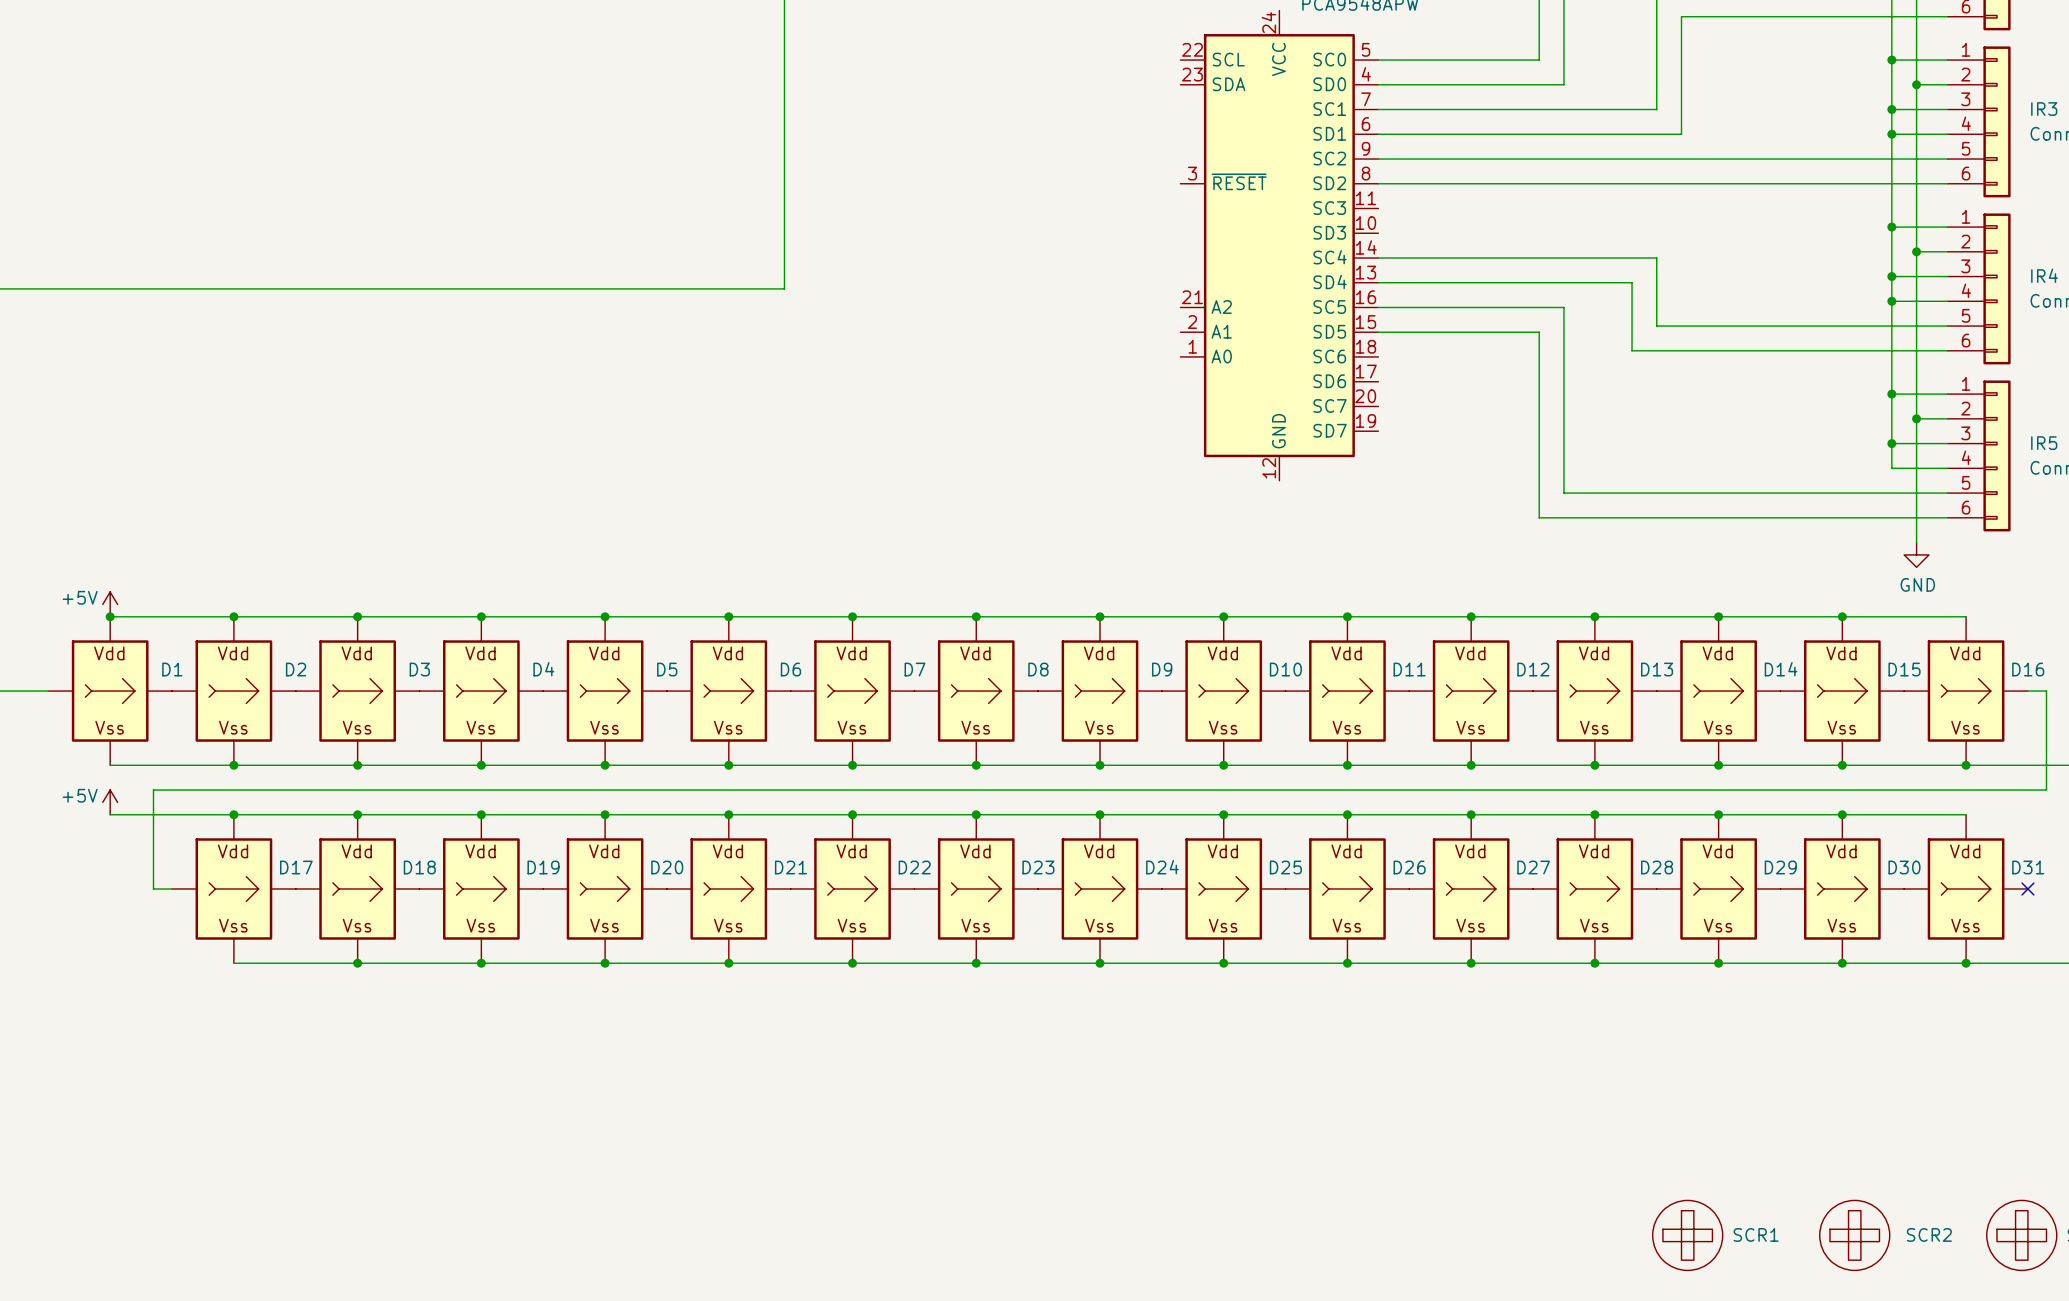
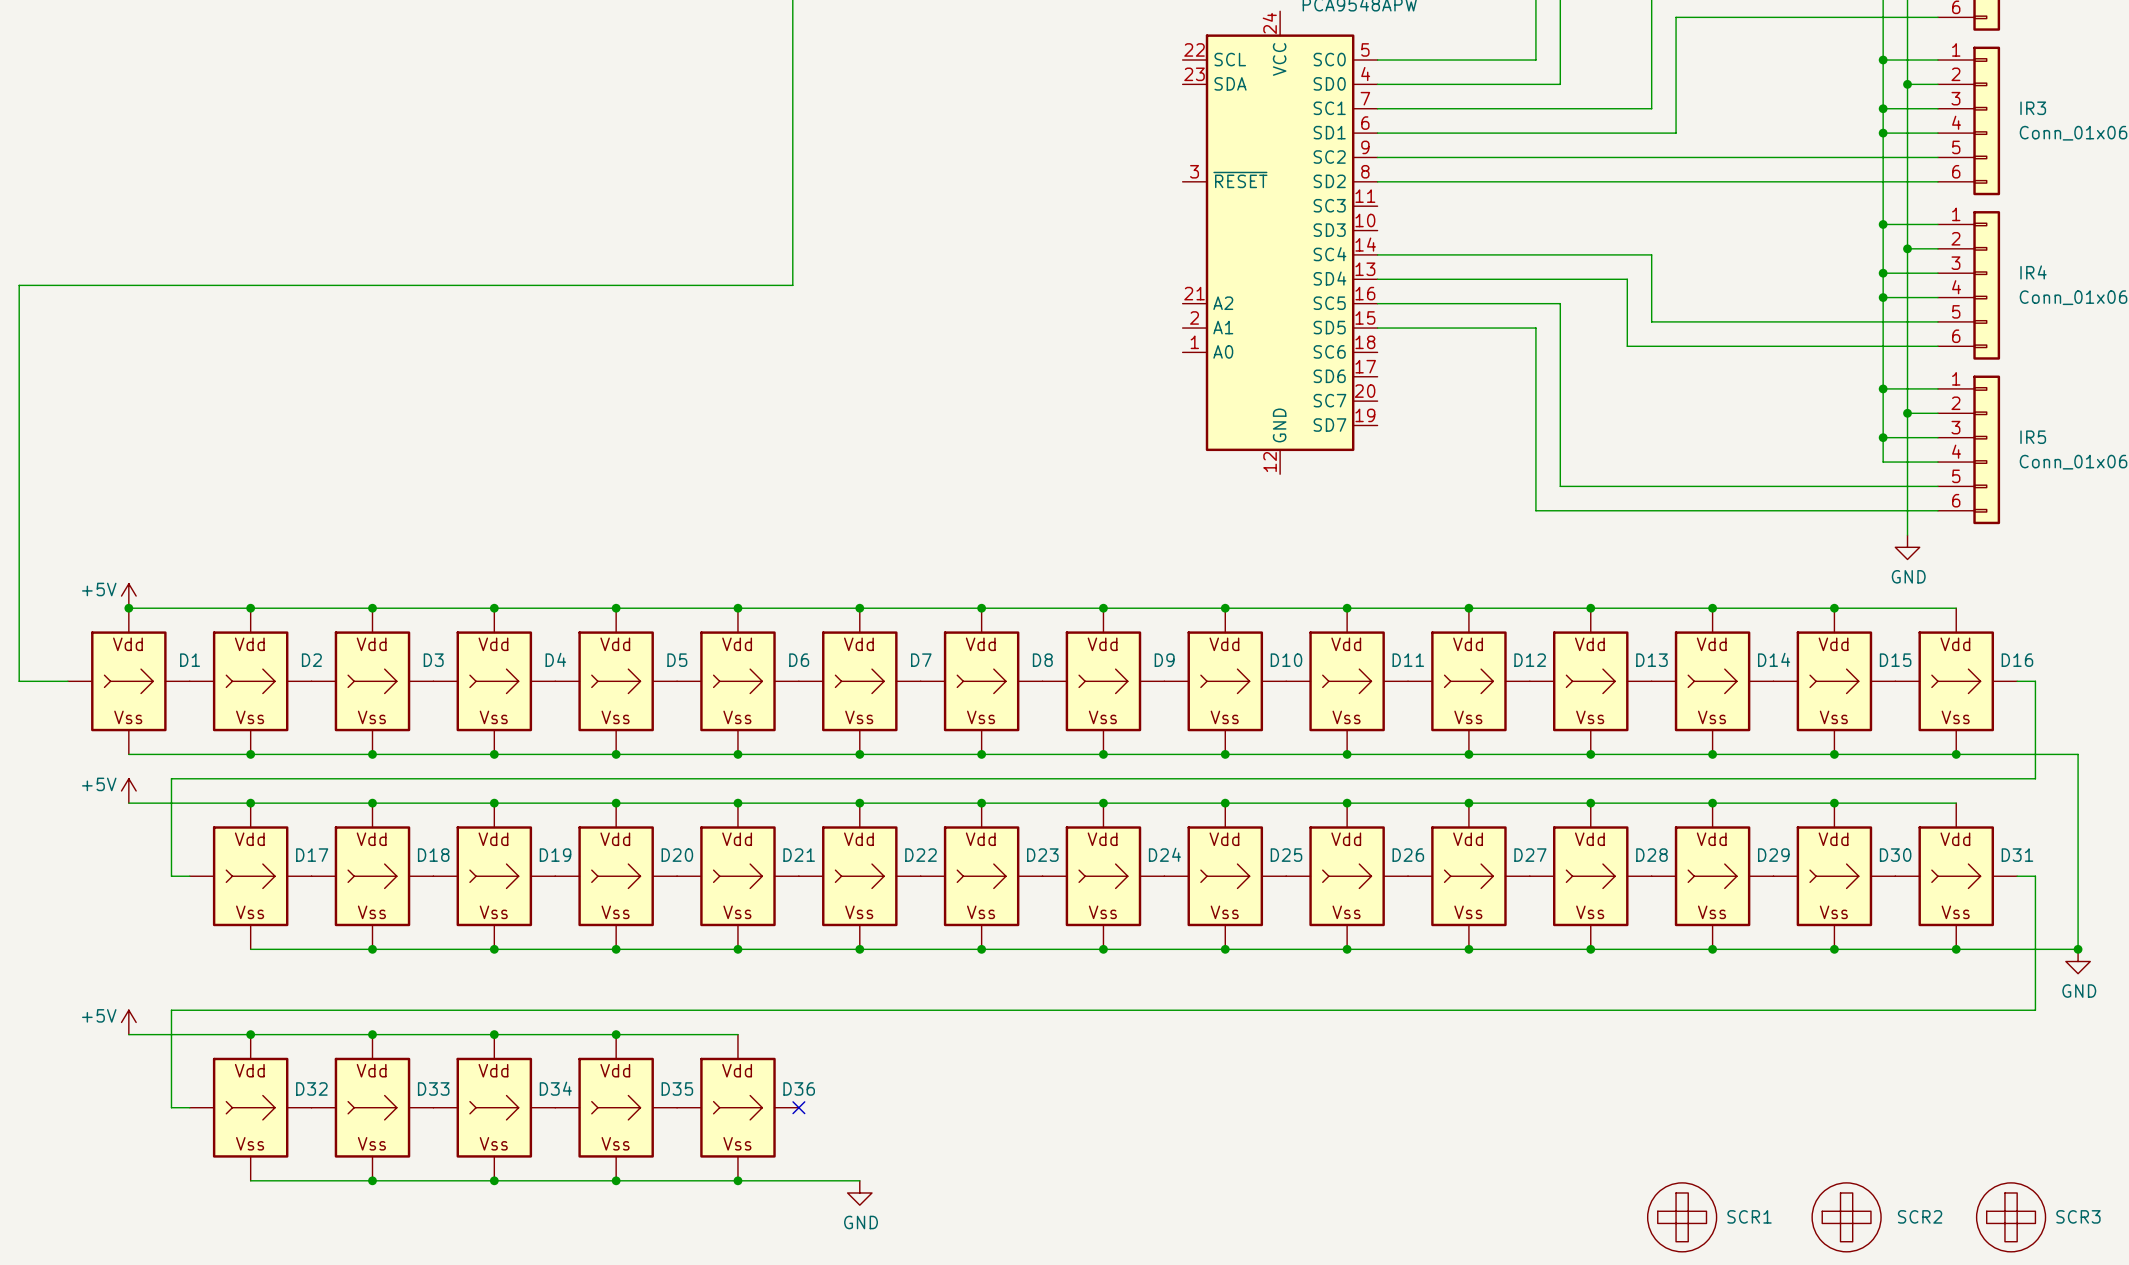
wire: none -> (2017, 876) (2035, 876) (2035, 1010) (171, 1010) (171, 1107) (189, 1107)
no-connect mark: (2027, 888) -> none
power symbol: none -> +5V (128, 1022)
wire: none -> (128, 1034) (737, 1034)
junction: none -> (250, 1034)
junction: none -> (372, 1034)
junction: none -> (494, 1034)
junction: none -> (616, 1034)
D32: none -> (250, 1107)
D33: none -> (372, 1107)
D34: none -> (494, 1107)
D35: none -> (616, 1107)
D36: none -> (737, 1107)
no-connect mark: none -> (798, 1107)
wire: none -> (250, 1180) (859, 1180)
junction: none -> (372, 1180)
junction: none -> (494, 1180)
junction: none -> (616, 1180)
junction: none -> (737, 1180)
power symbol: none -> GND (859, 1192)

